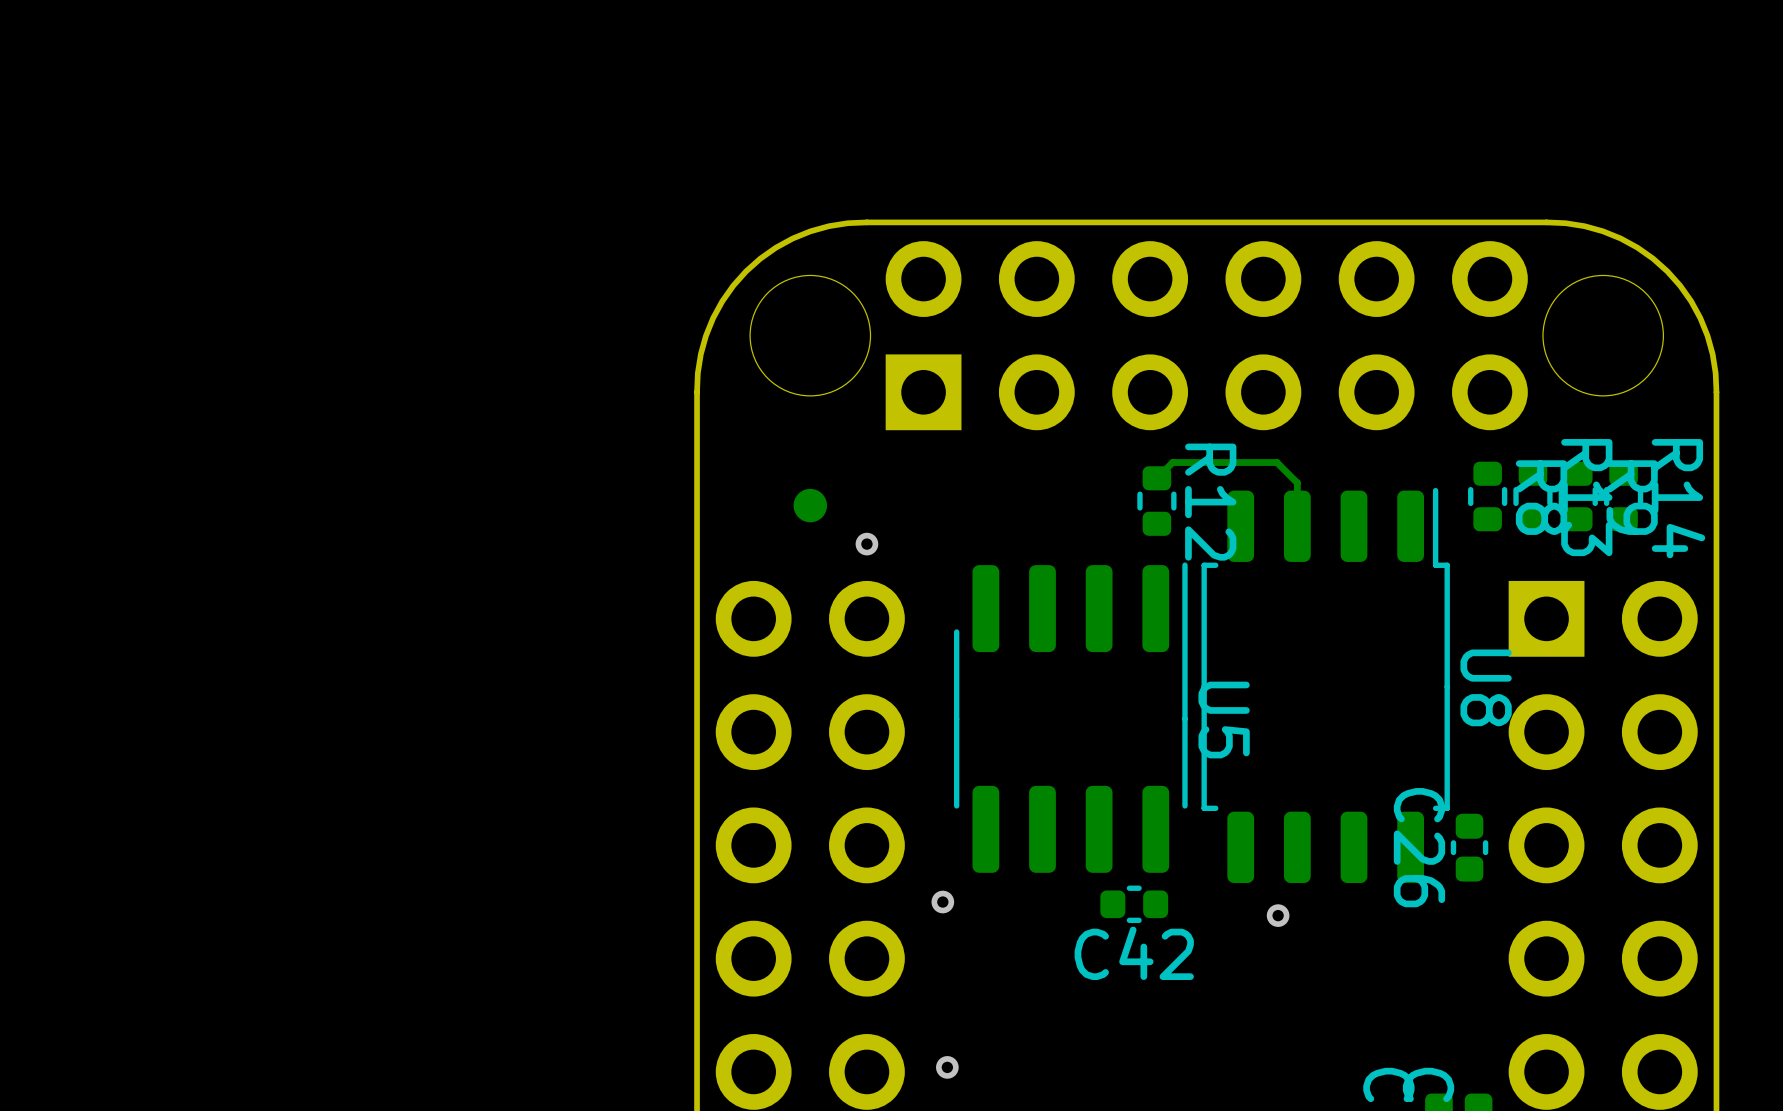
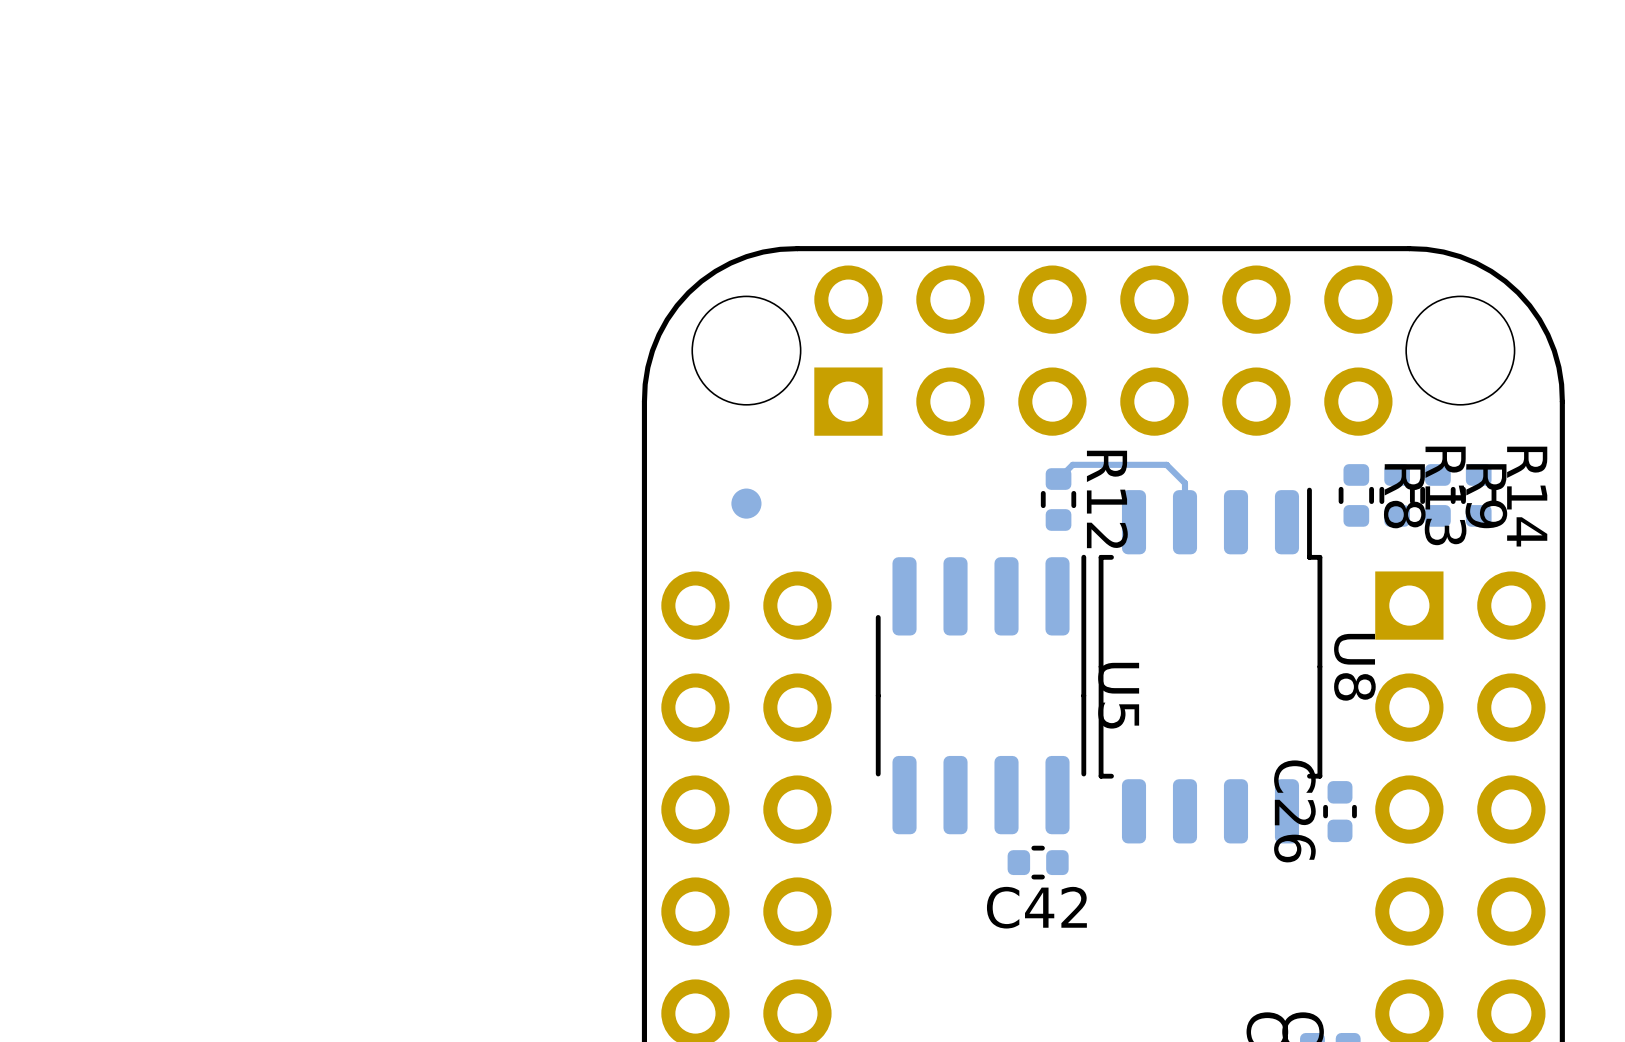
via: (866, 544) -> none
via: (942, 902) -> none
via: (1278, 915) -> none
via: (947, 1067) -> none

